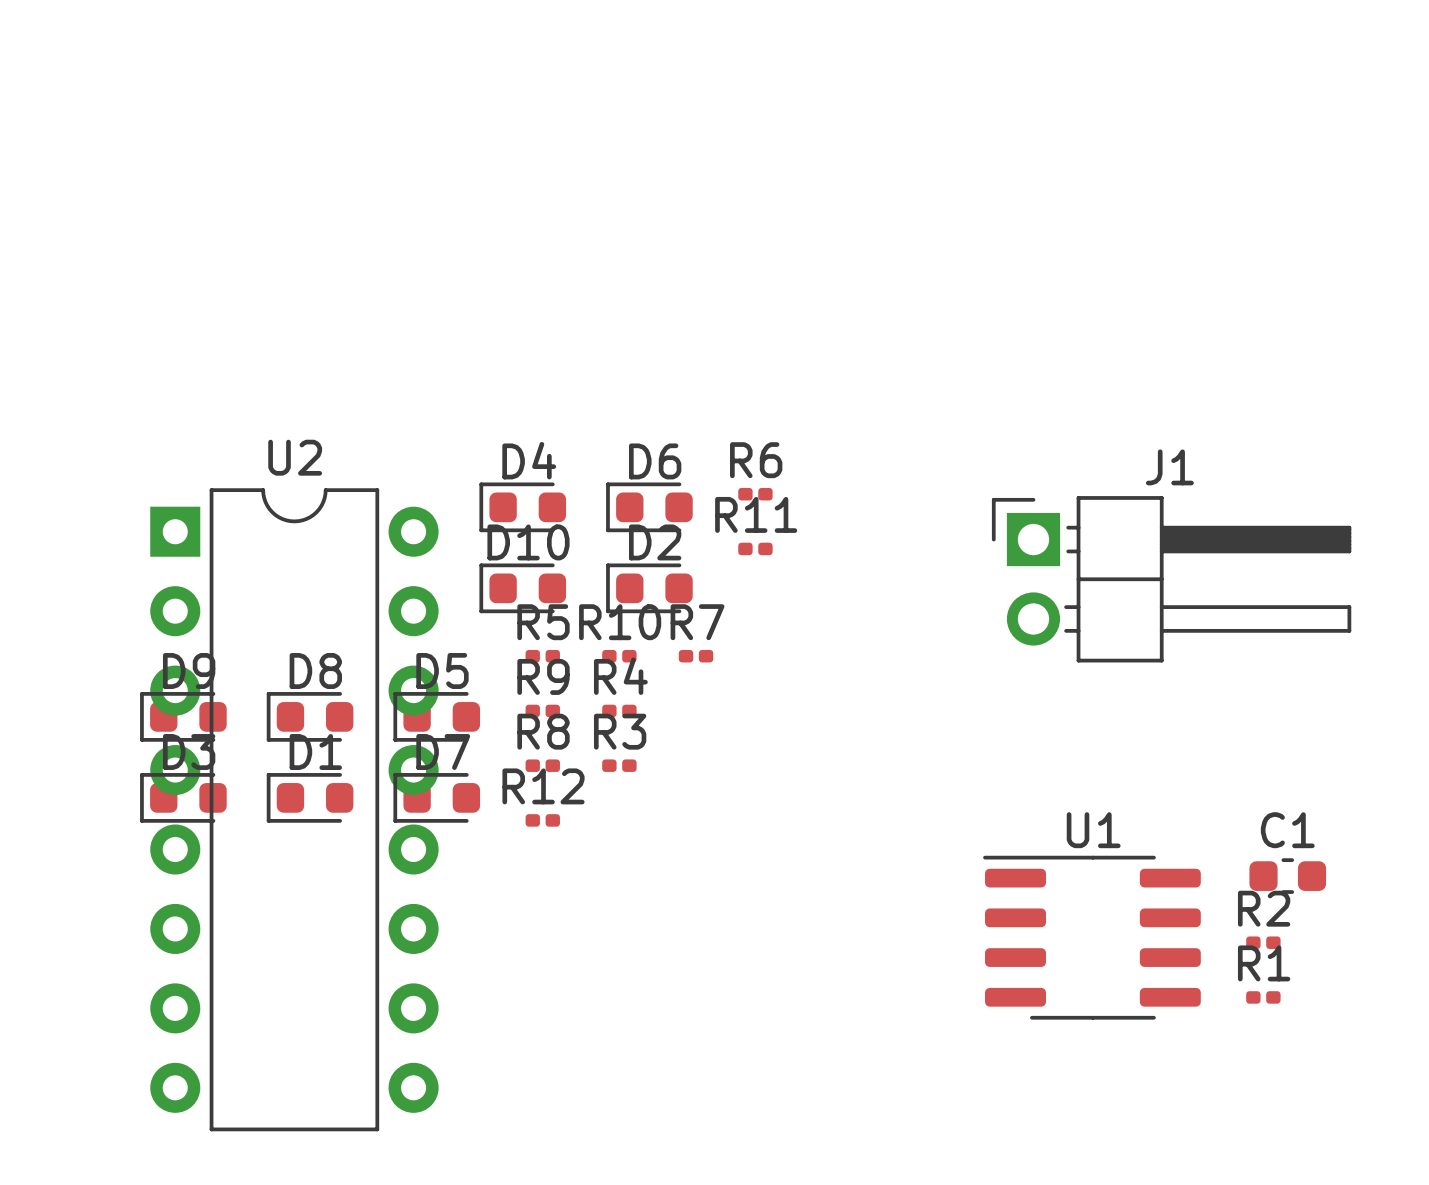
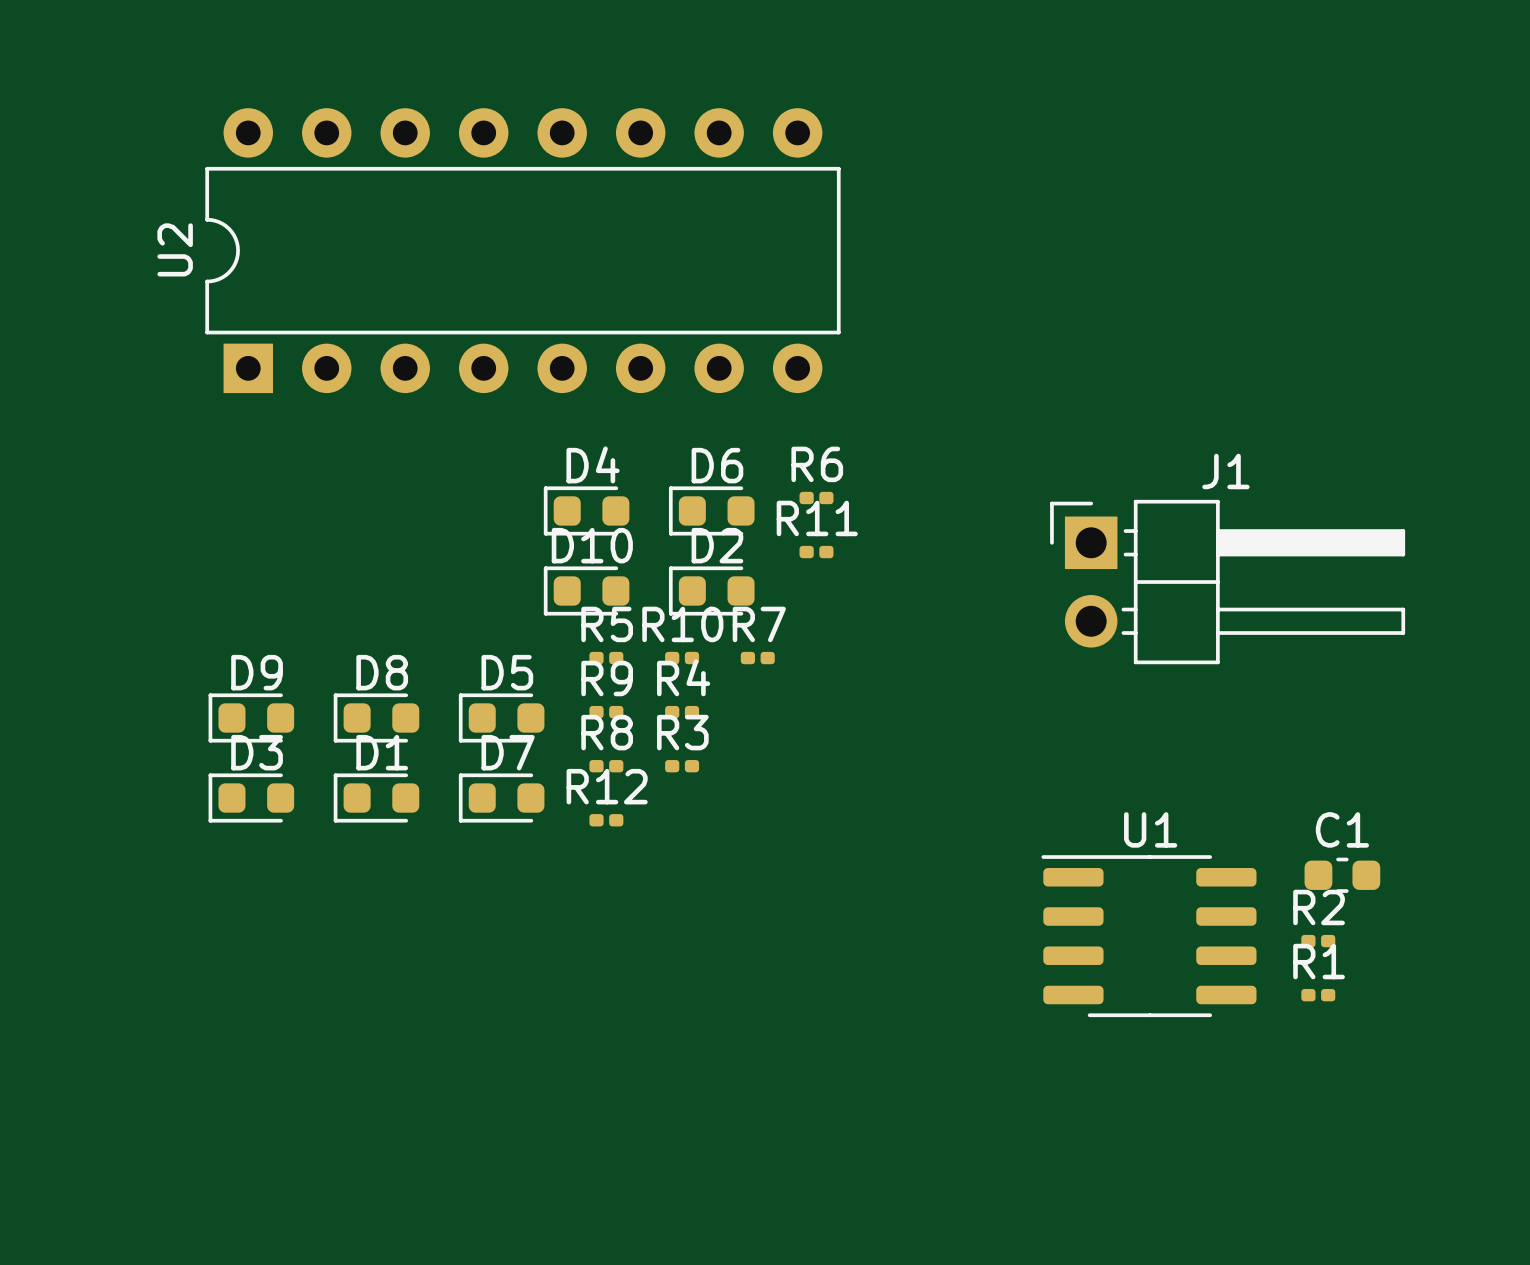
U2 rotation: 0° (294, 809) -> 90° counterclockwise (522, 250)
U2 position: (294, 809) -> (522, 250)

